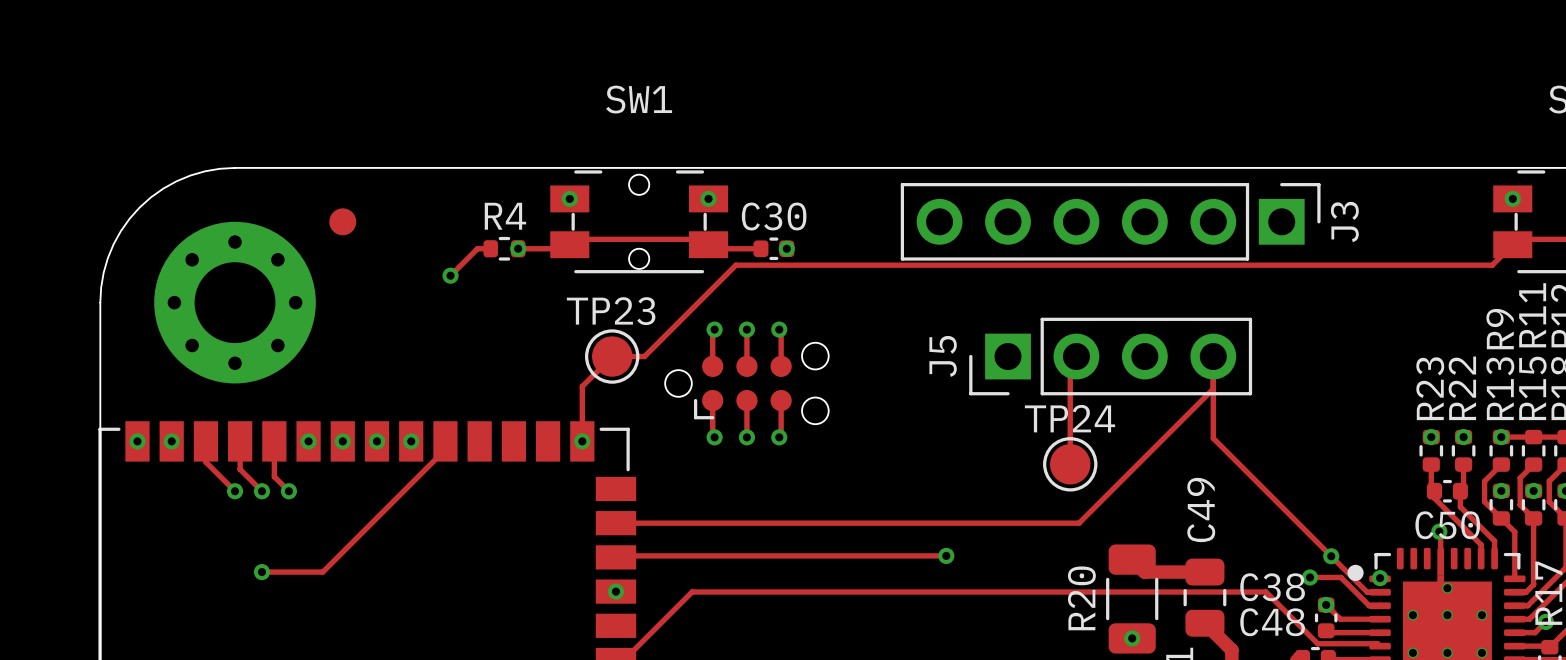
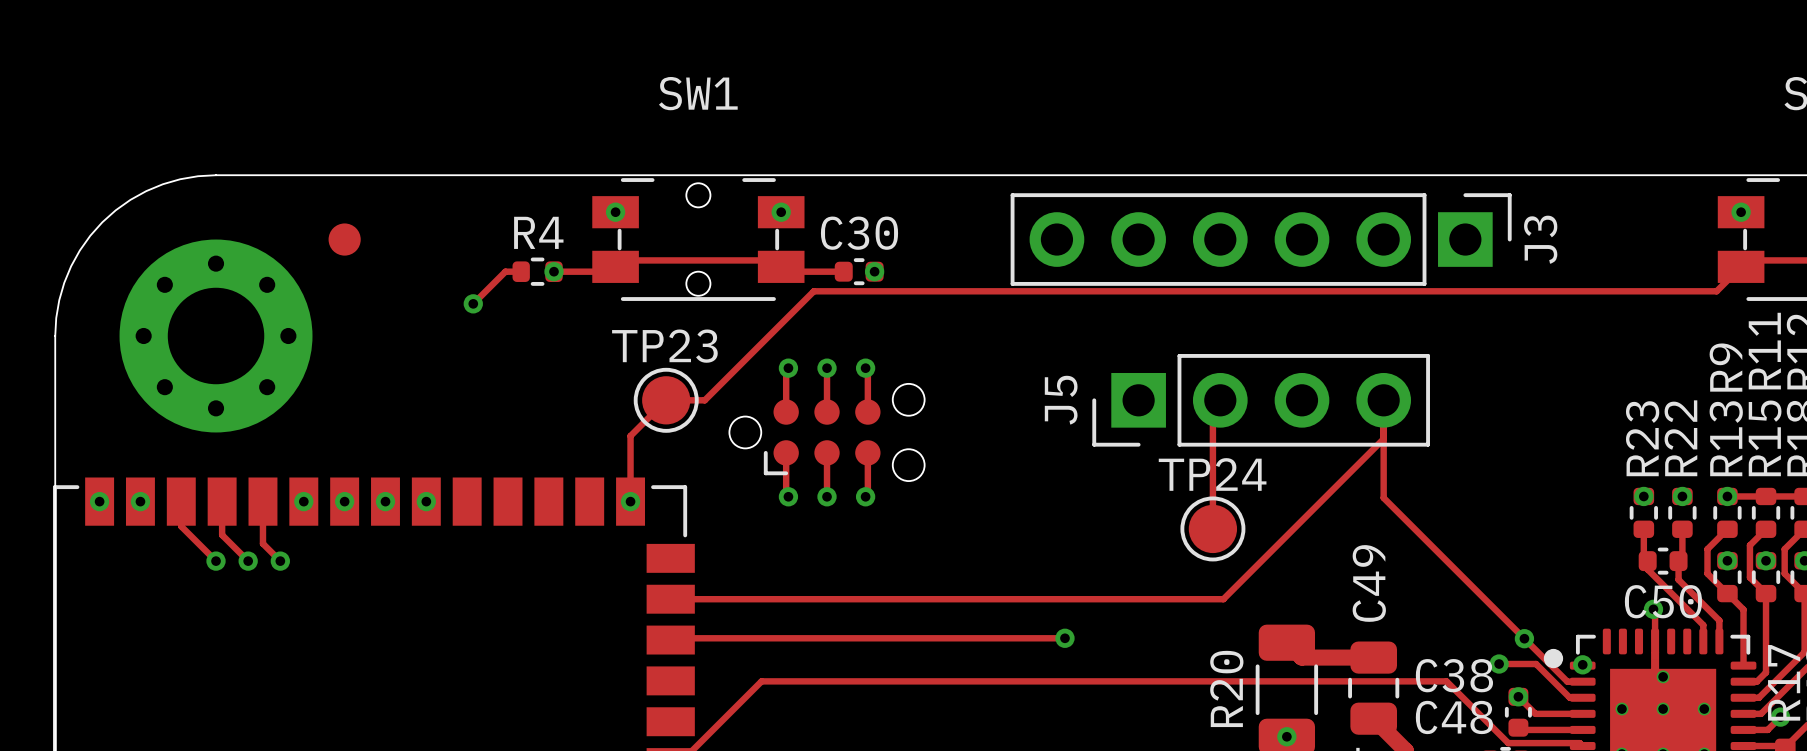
track: (445, 441) (445, 449) (322, 572) (261, 572) -> none
via: (261, 572) -> none
via: (615, 591) -> none

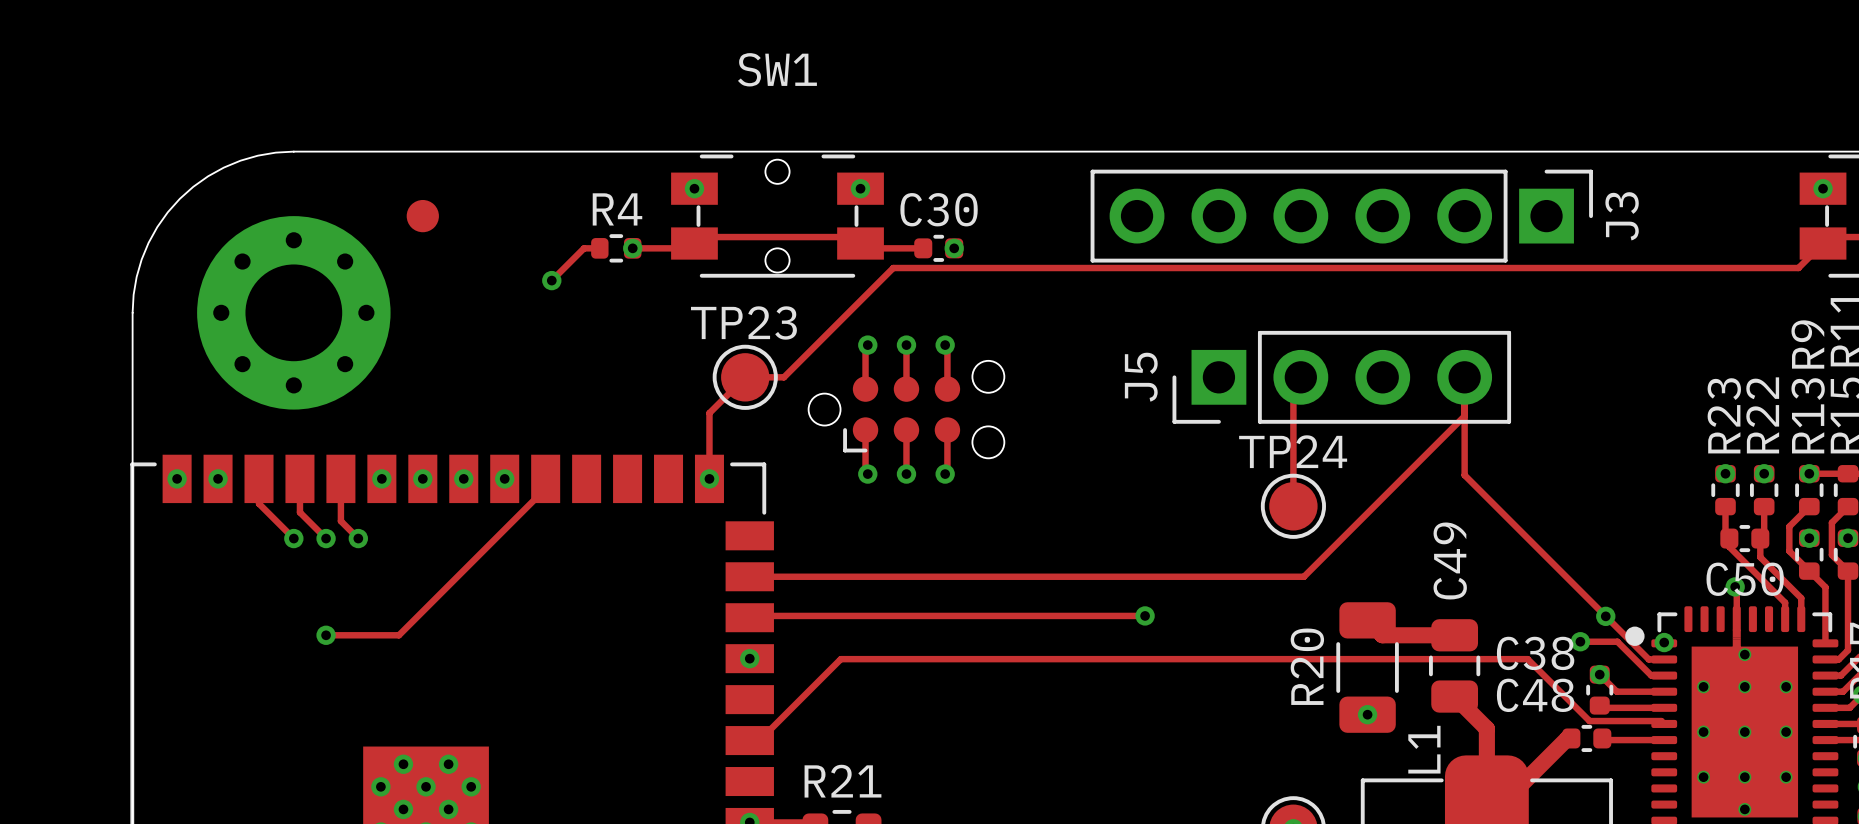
track: none -> (545, 478) (545, 488) (398, 635) (326, 635)
via: none -> (326, 635)
via: none -> (749, 658)

